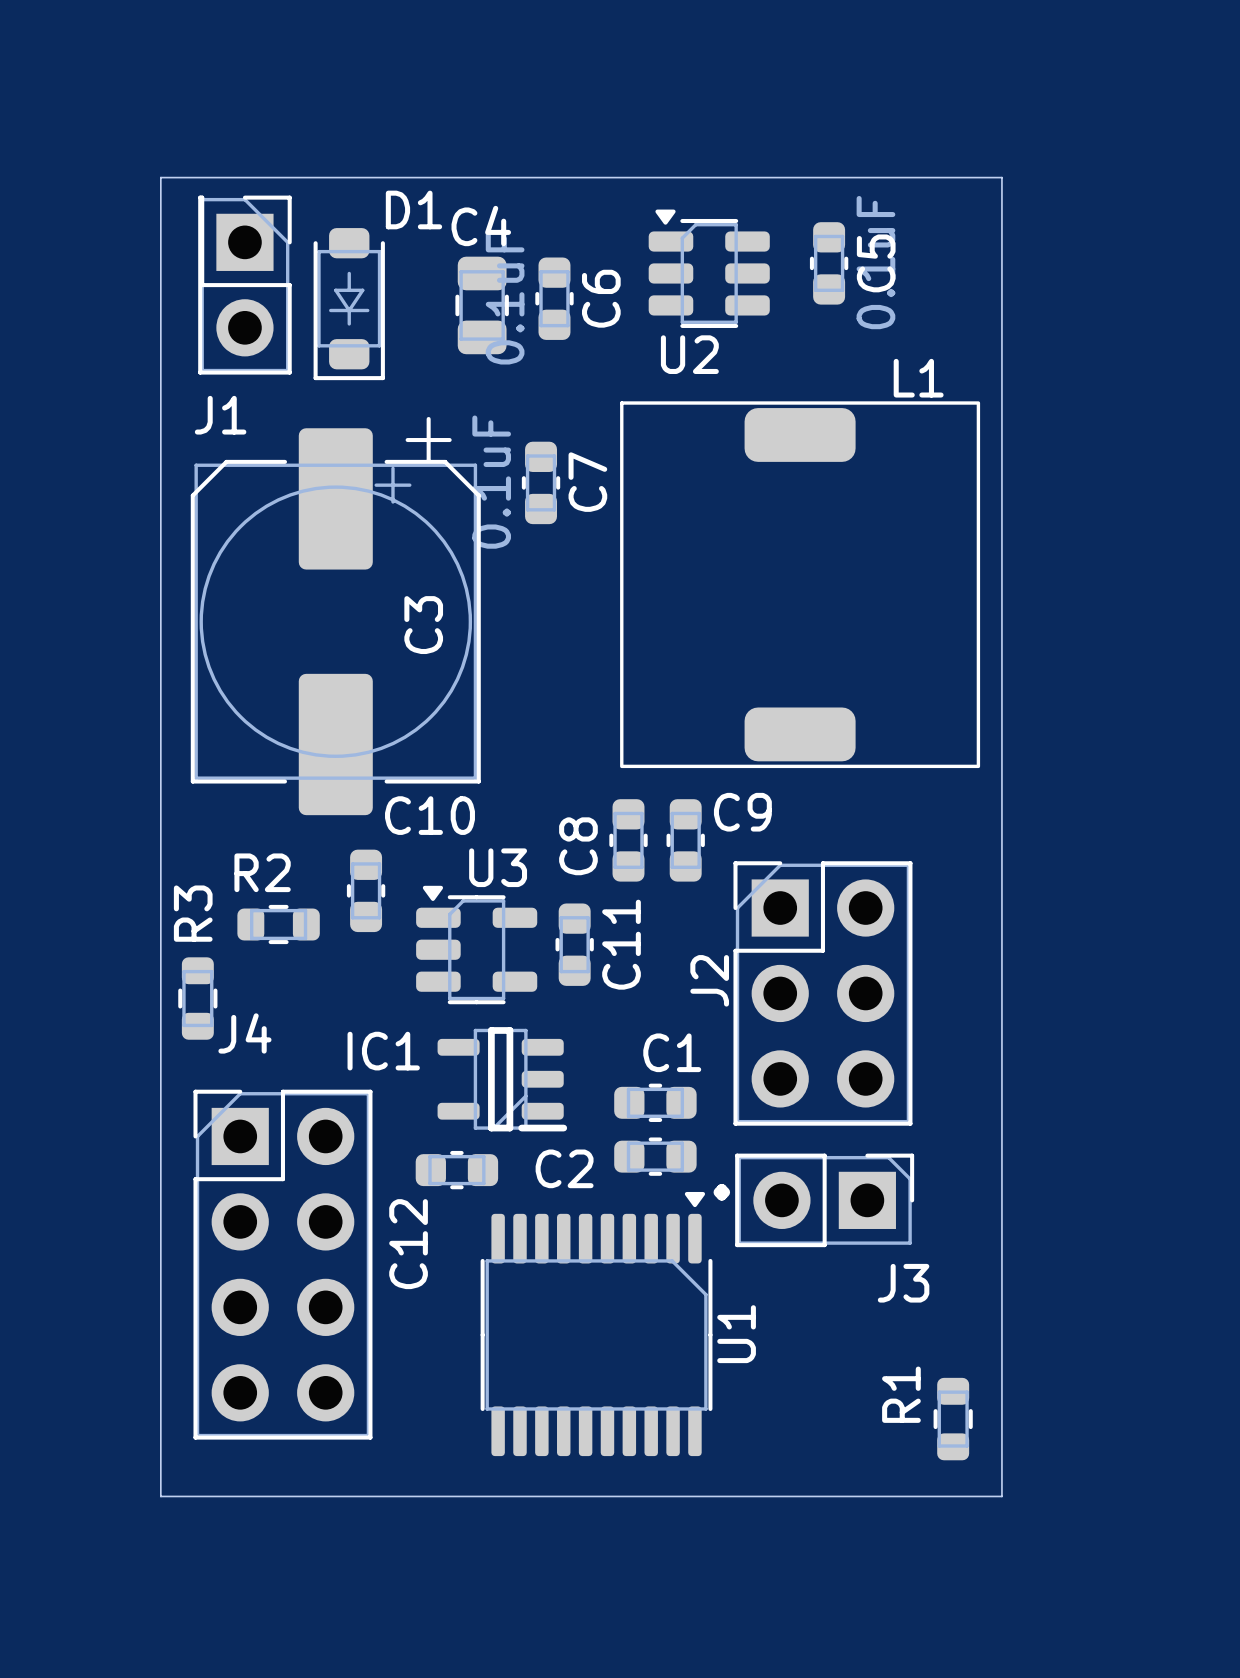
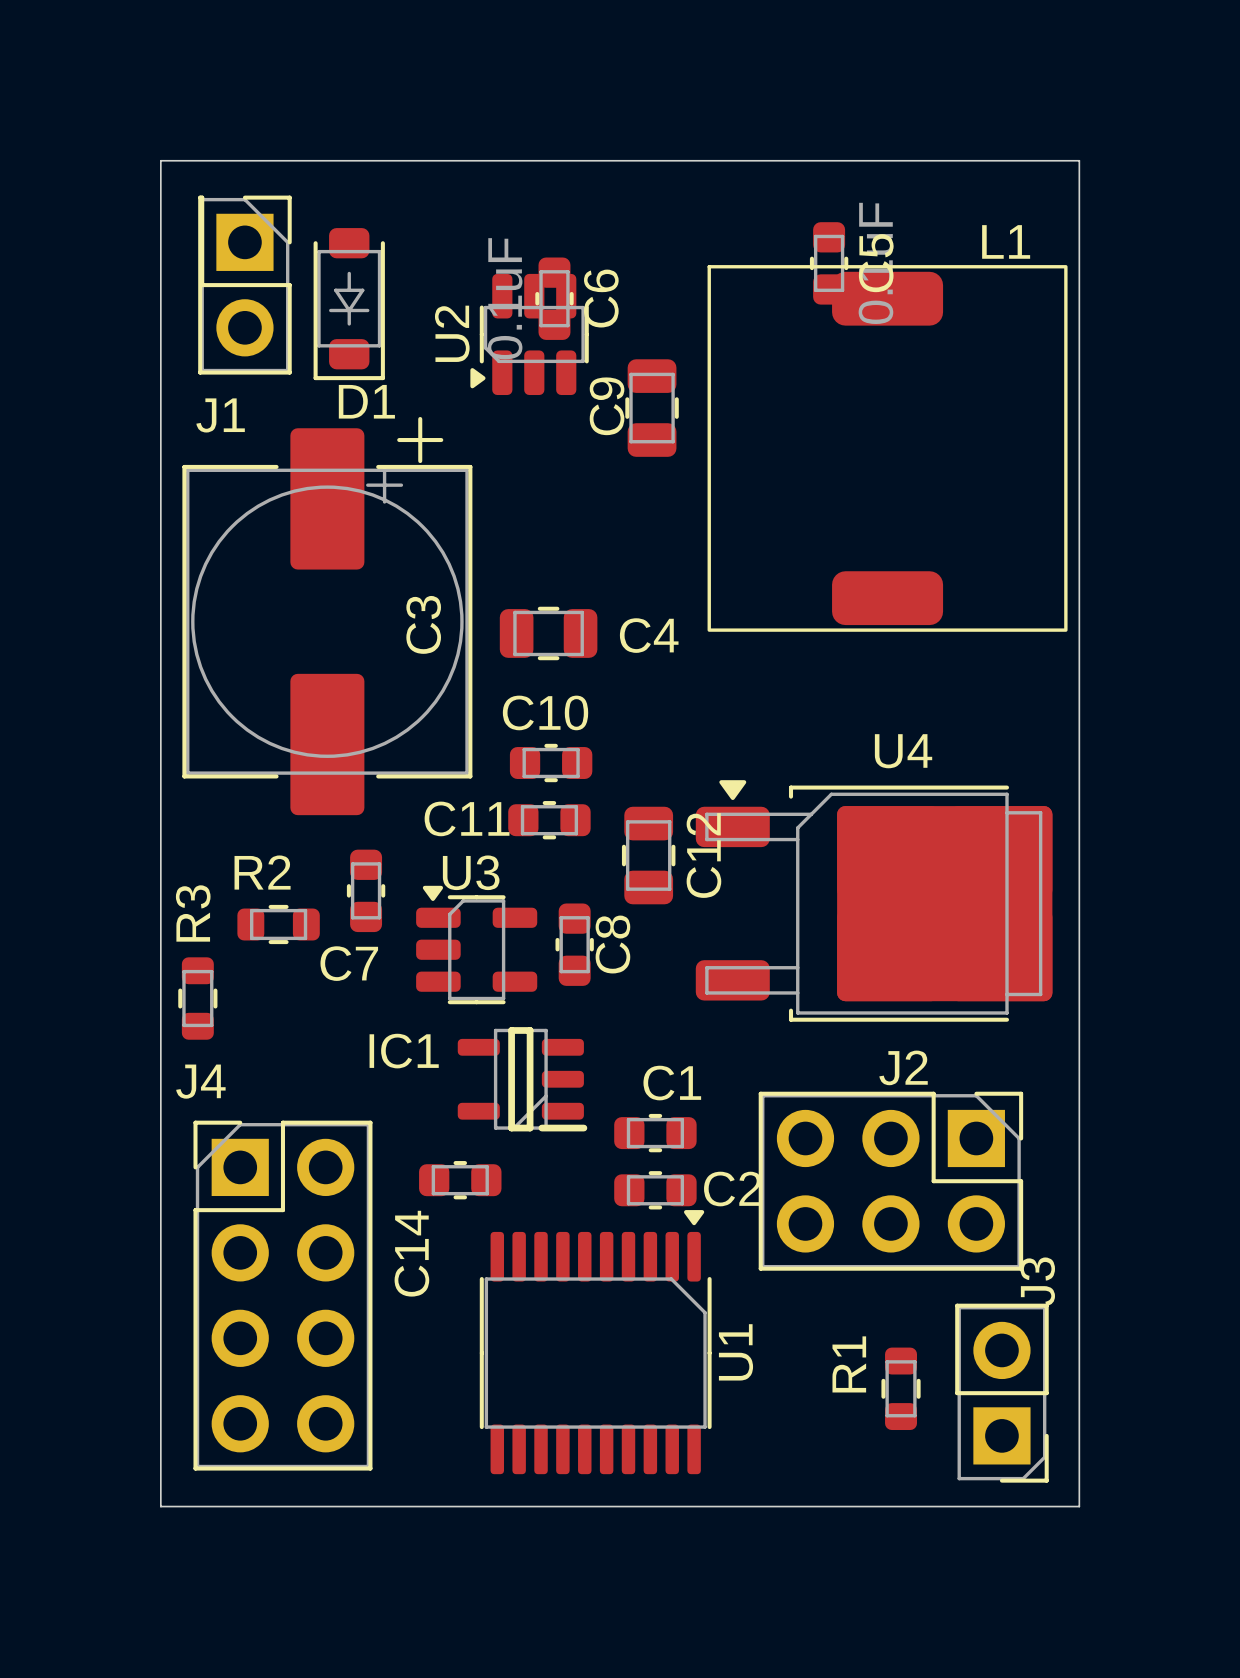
board edge: (160, 177) (1001, 177) (1001, 1496) (160, 1496) -> (160, 177) (160, 160) (1079, 160) (1079, 1506) (160, 1506) (160, 1496)
D1 name position: D1 (413, 209) -> D1 (366, 401)
U2 rotation: 0° (709, 268) -> 90° counterclockwise (529, 334)
U2 position: (709, 268) -> (529, 334)
C4 rotation: 0° (482, 305) -> 90° clockwise (548, 633)
C4 position: (482, 305) -> (548, 633)
U2 name position: U2 (689, 354) -> U2 (452, 333)
C3 footprint: [190, 416, 481, 816] -> [182, 416, 473, 816]
C7: 0.1uF (541, 482) -> none
L1 position: (800, 584) -> (887, 448)
C10: none -> (551, 763)
C9 footprint: [666, 799, 705, 882] -> [625, 359, 679, 457]
C9 name position: C9 (742, 812) -> C9 (607, 406)
C10 name: C10 (430, 815) -> C7 (349, 963)
C11: none -> (549, 820)
C8: (628, 840) -> none
U3 name position: U3 (498, 867) -> U3 (471, 872)
U4: none -> (874, 900)
C11 name: C11 (621, 944) -> C8 (612, 944)
J2 rotation: 0° (822, 993) -> 90° clockwise (890, 1181)
J2 position: (822, 993) -> (890, 1181)
J4 name position: J4 (244, 1033) -> J4 (200, 1081)
IC1 position: (502, 1079) -> (522, 1079)
C1 position: (655, 1102) -> (655, 1133)
C12 footprint: [415, 1150, 499, 1190] -> [621, 806, 676, 905]
C2 position: (655, 1156) -> (655, 1190)
C2 name position: C2 (564, 1168) -> C2 (732, 1189)
C14: none -> (460, 1180)
text: . (721, 1192) -> none
J3 rotation: 0° (824, 1200) -> 90° clockwise (1001, 1393)
J3 position: (824, 1200) -> (1001, 1393)
C12 name position: C12 (408, 1244) -> C12 (703, 855)
J4 position: (282, 1264) -> (282, 1295)
J3 name position: J3 (903, 1283) -> J3 (1037, 1281)
U1 position: (596, 1324) -> (595, 1342)
R1 position: (953, 1419) -> (901, 1388)

